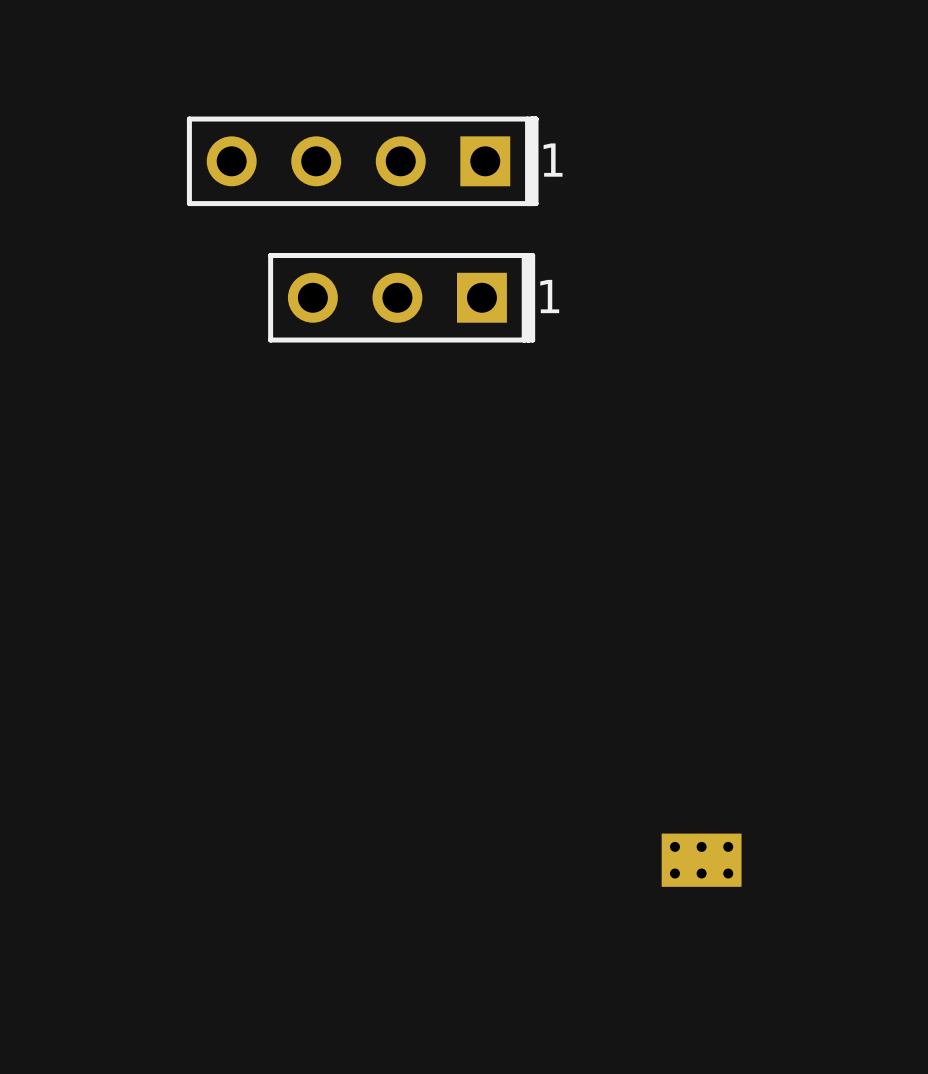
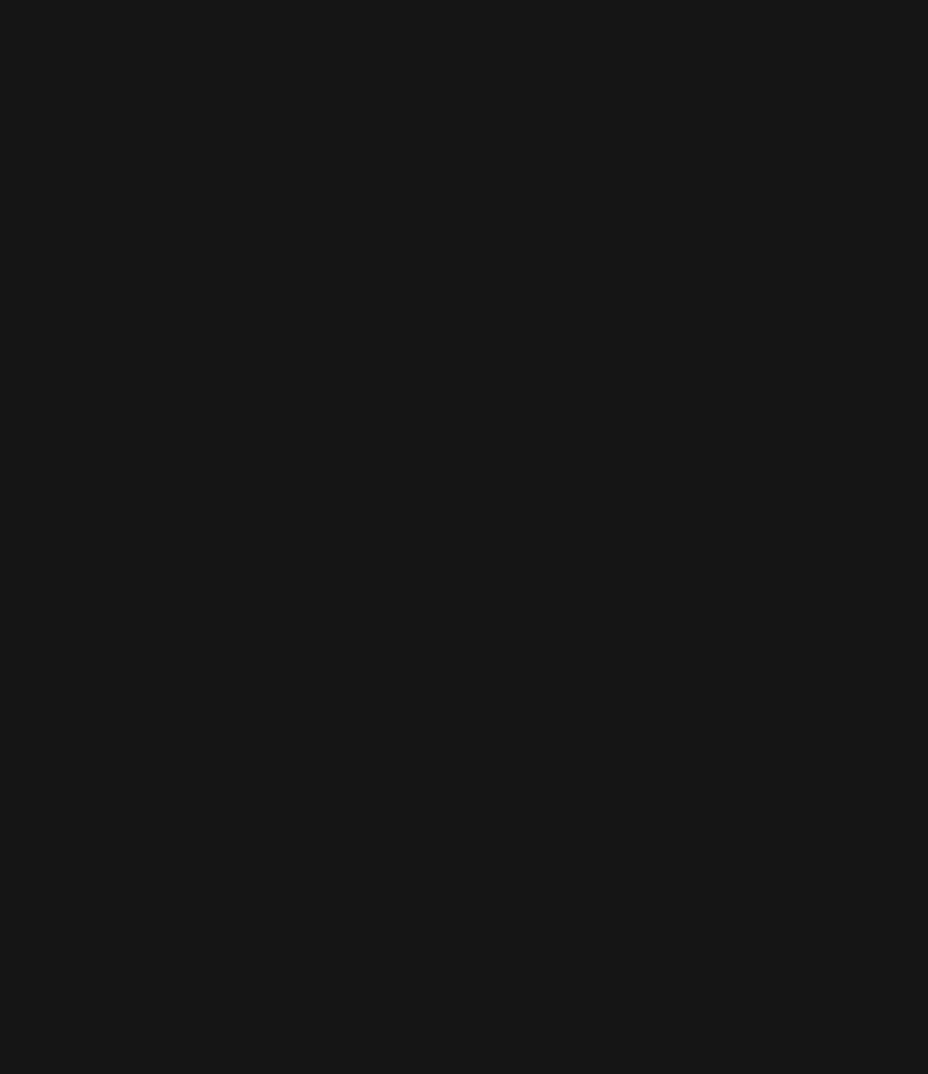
part: (362, 161) -> none
part: (401, 297) -> none
part: (701, 860) -> none

